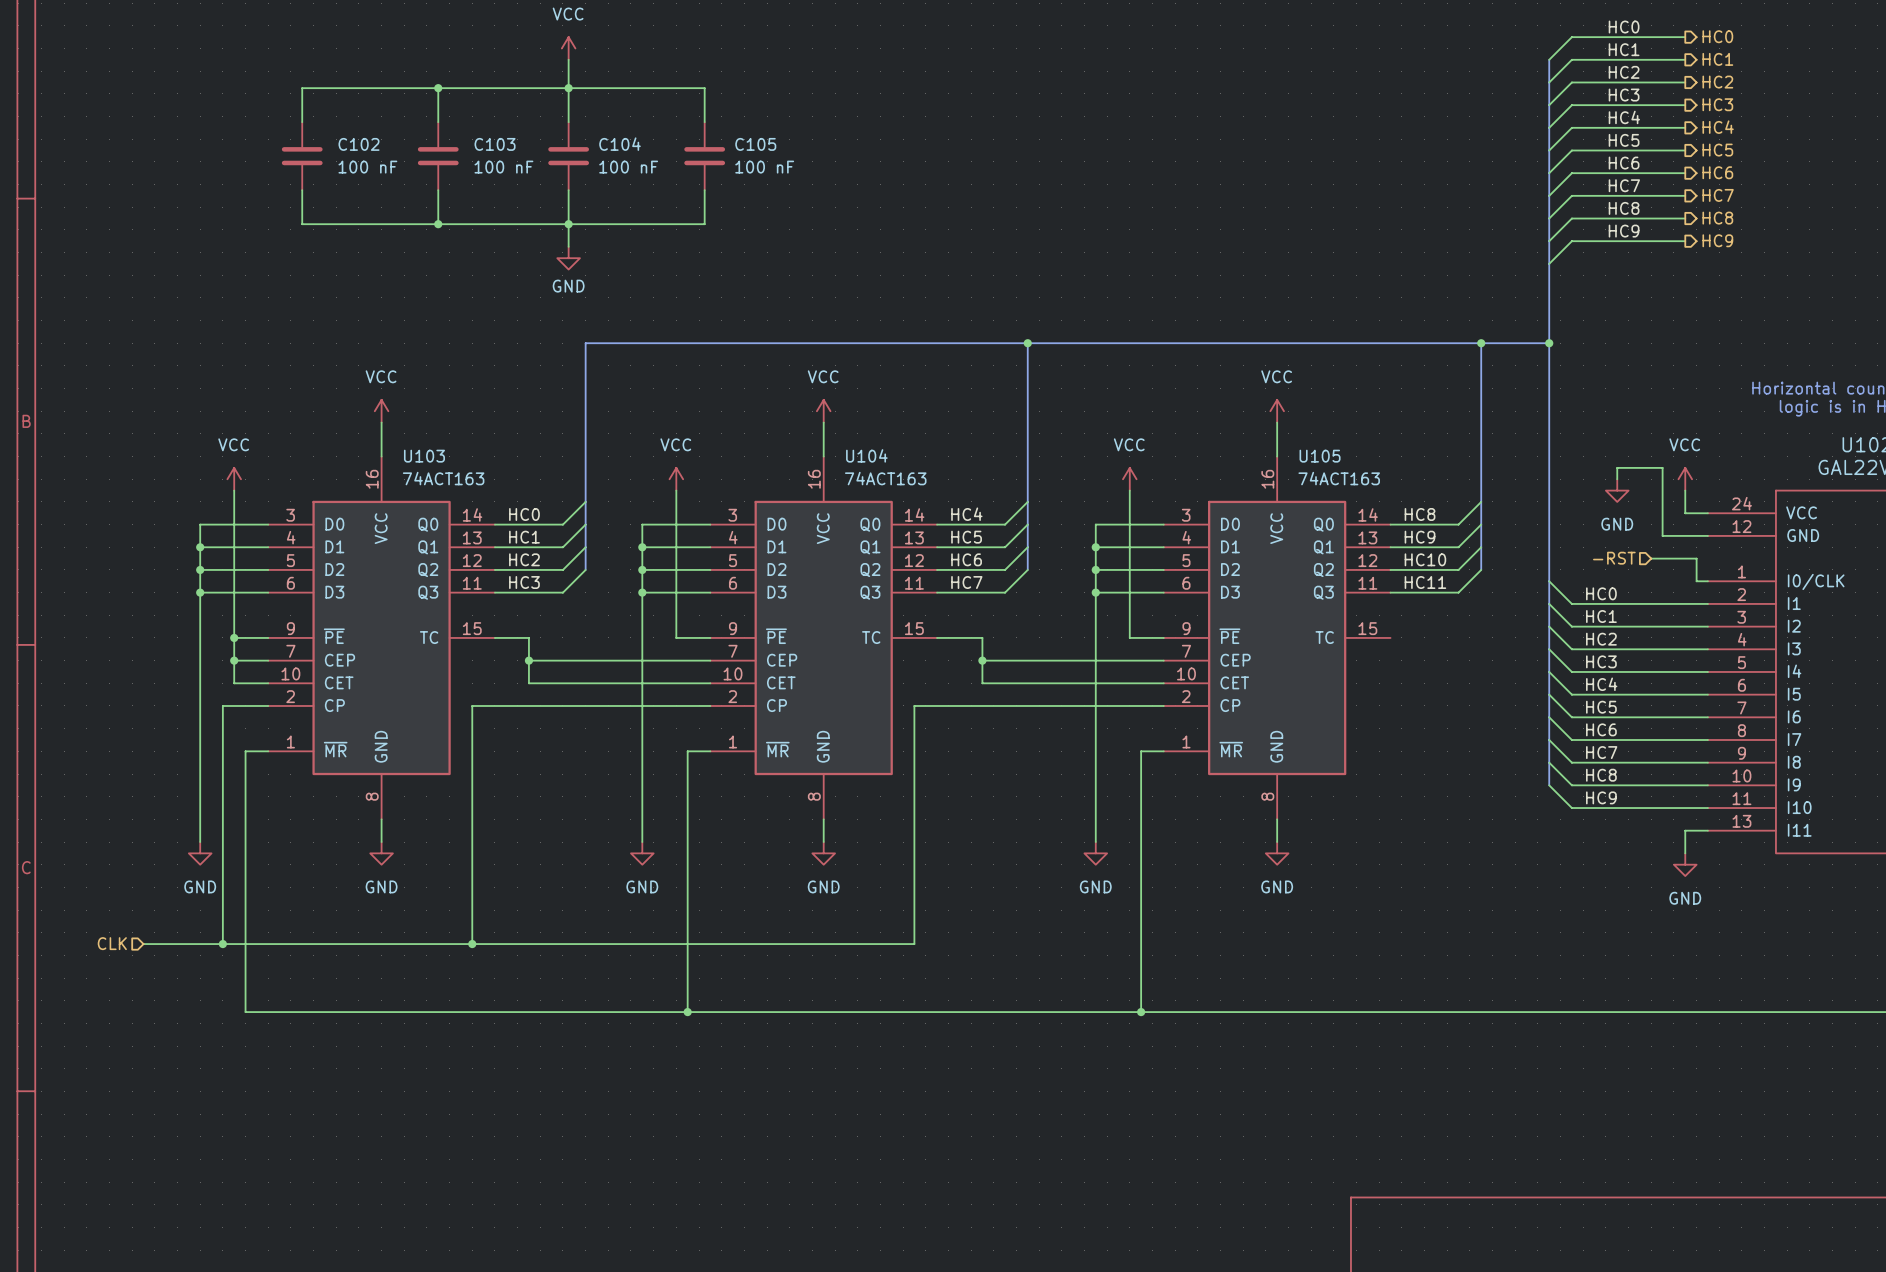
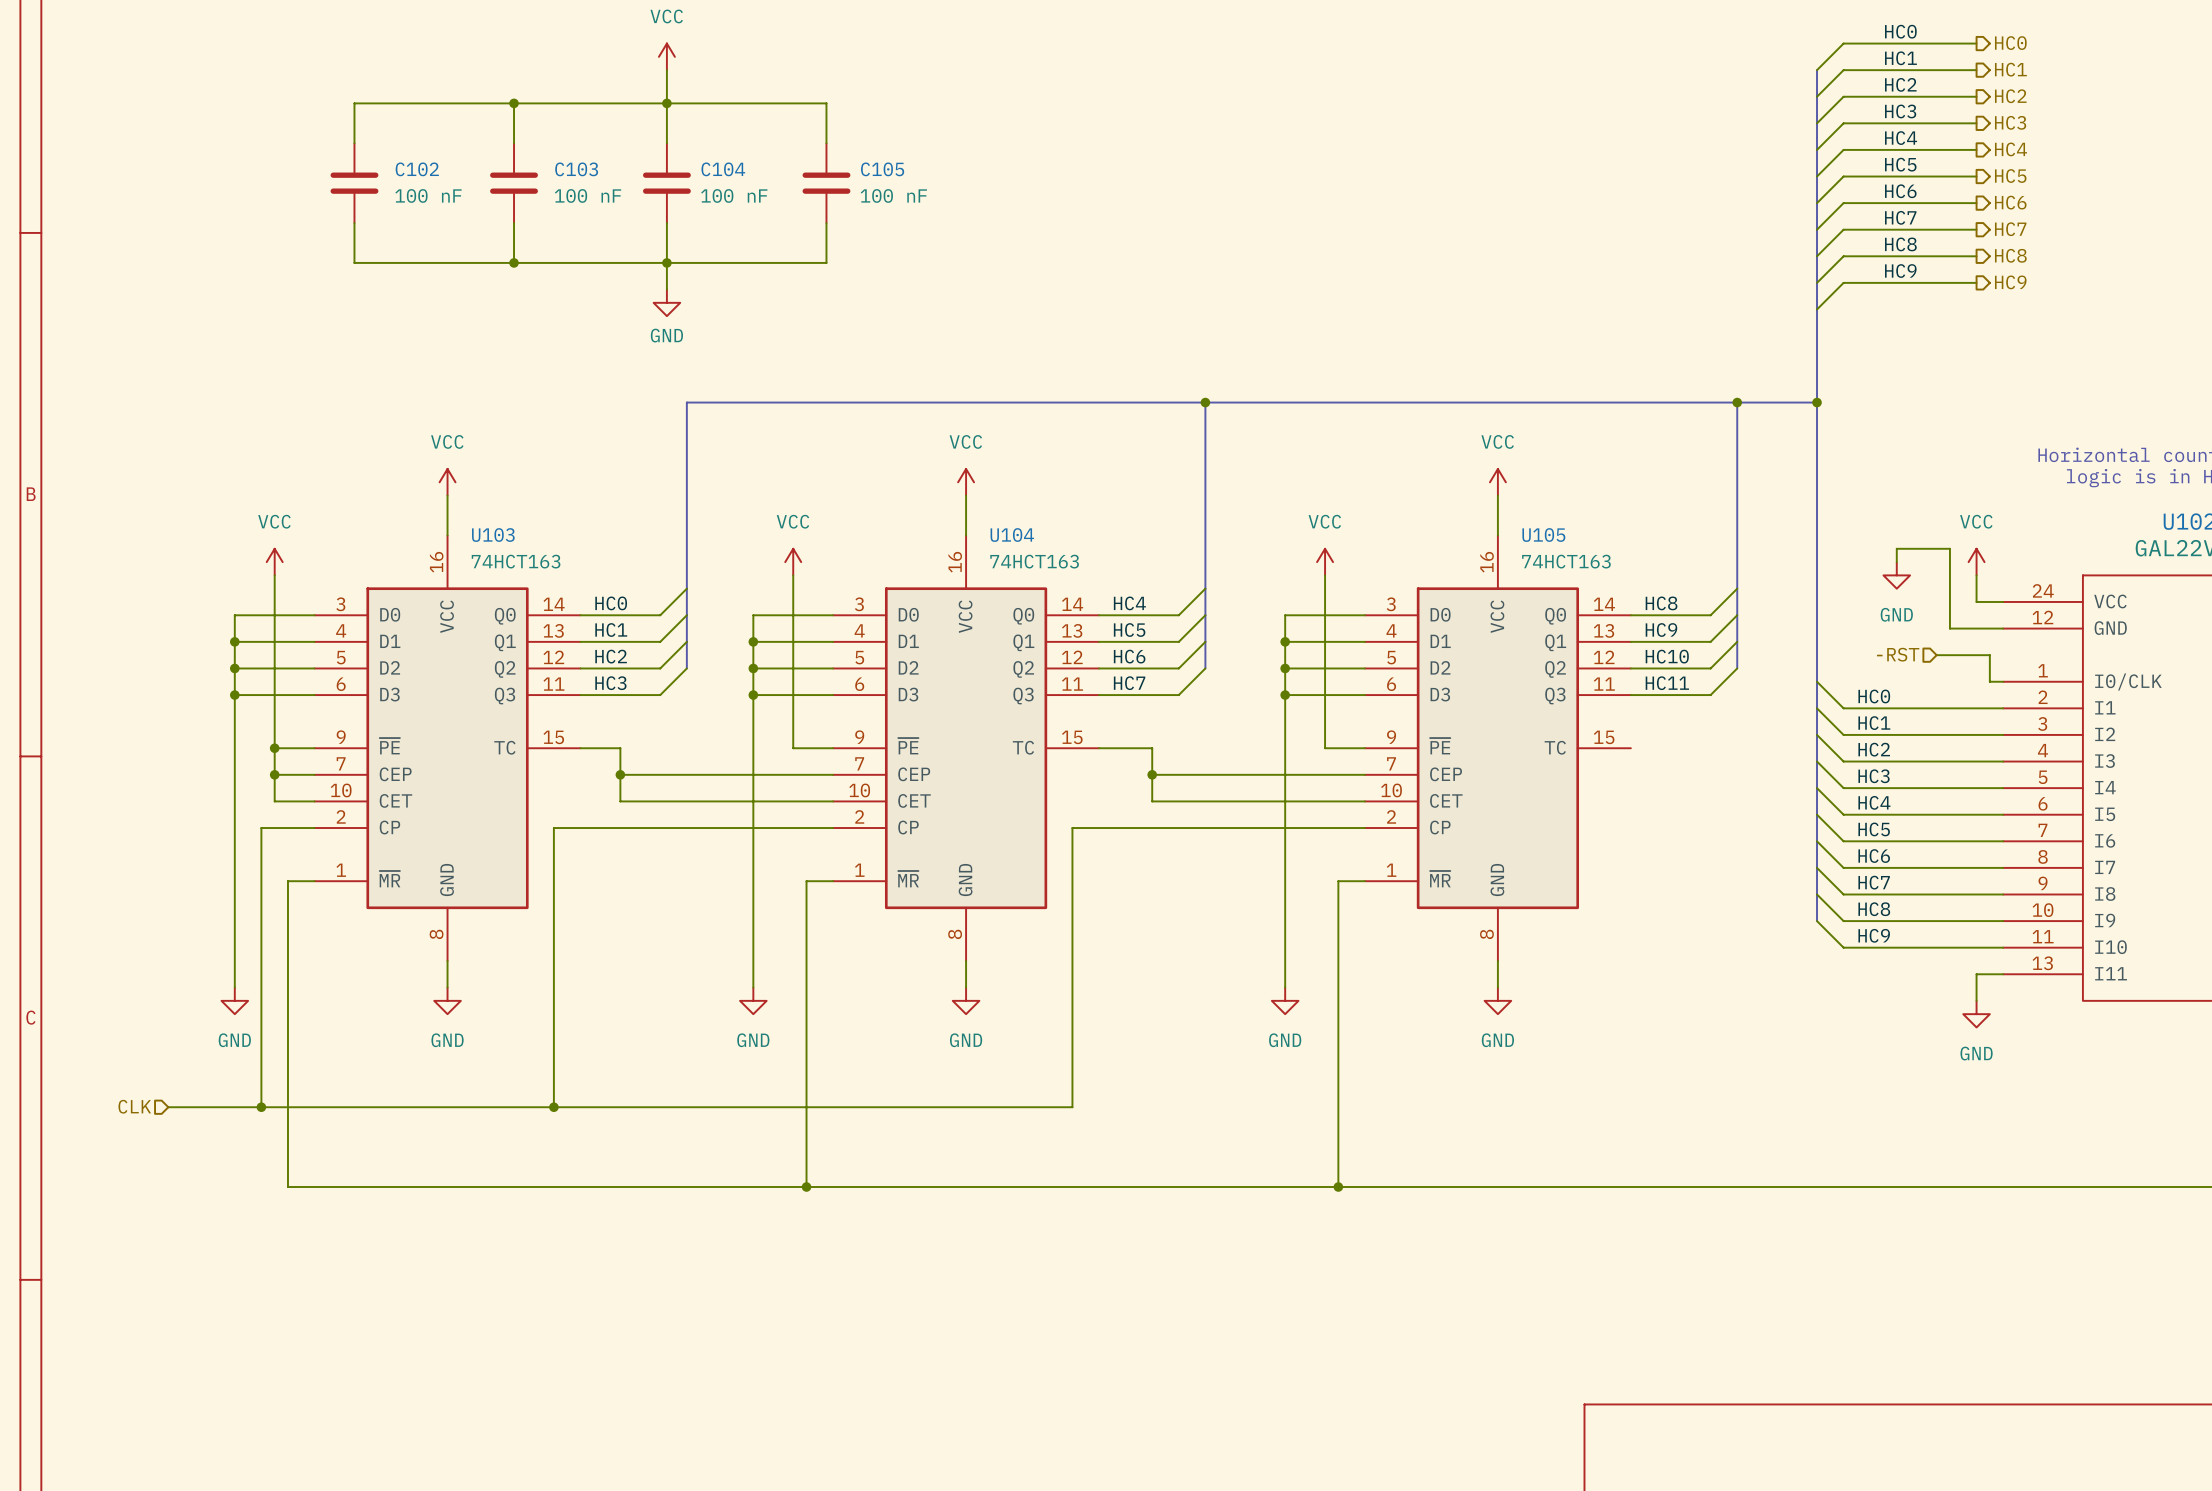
U103 value: 74ACT163 (443, 478) -> 74HCT163 (516, 561)
U104 value: 74ACT163 (885, 478) -> 74HCT163 (1034, 561)
U105 value: 74ACT163 (1339, 478) -> 74HCT163 (1566, 561)

